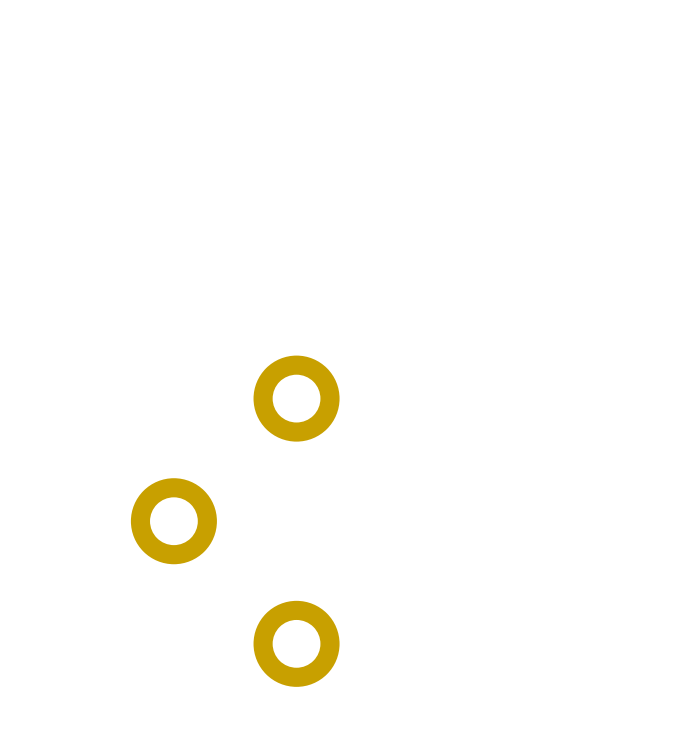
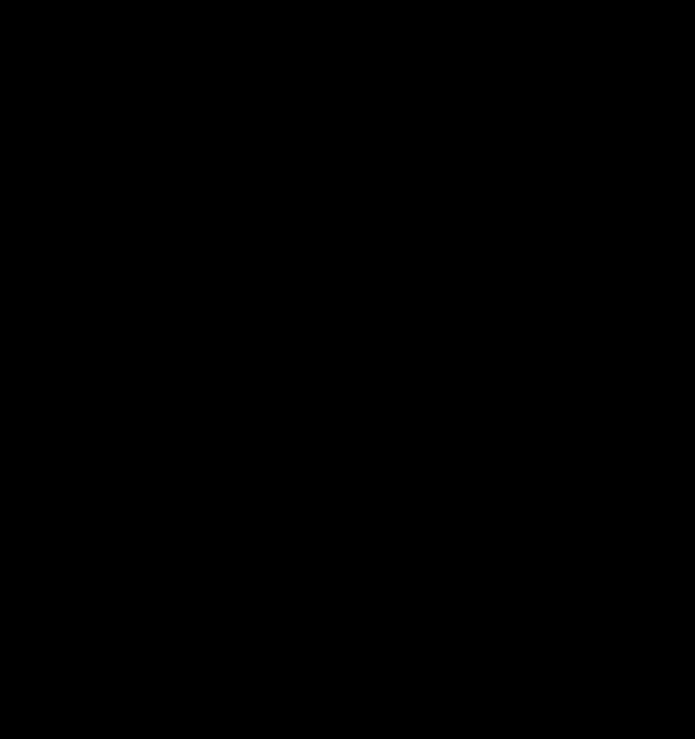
part: (235, 521) -> none

